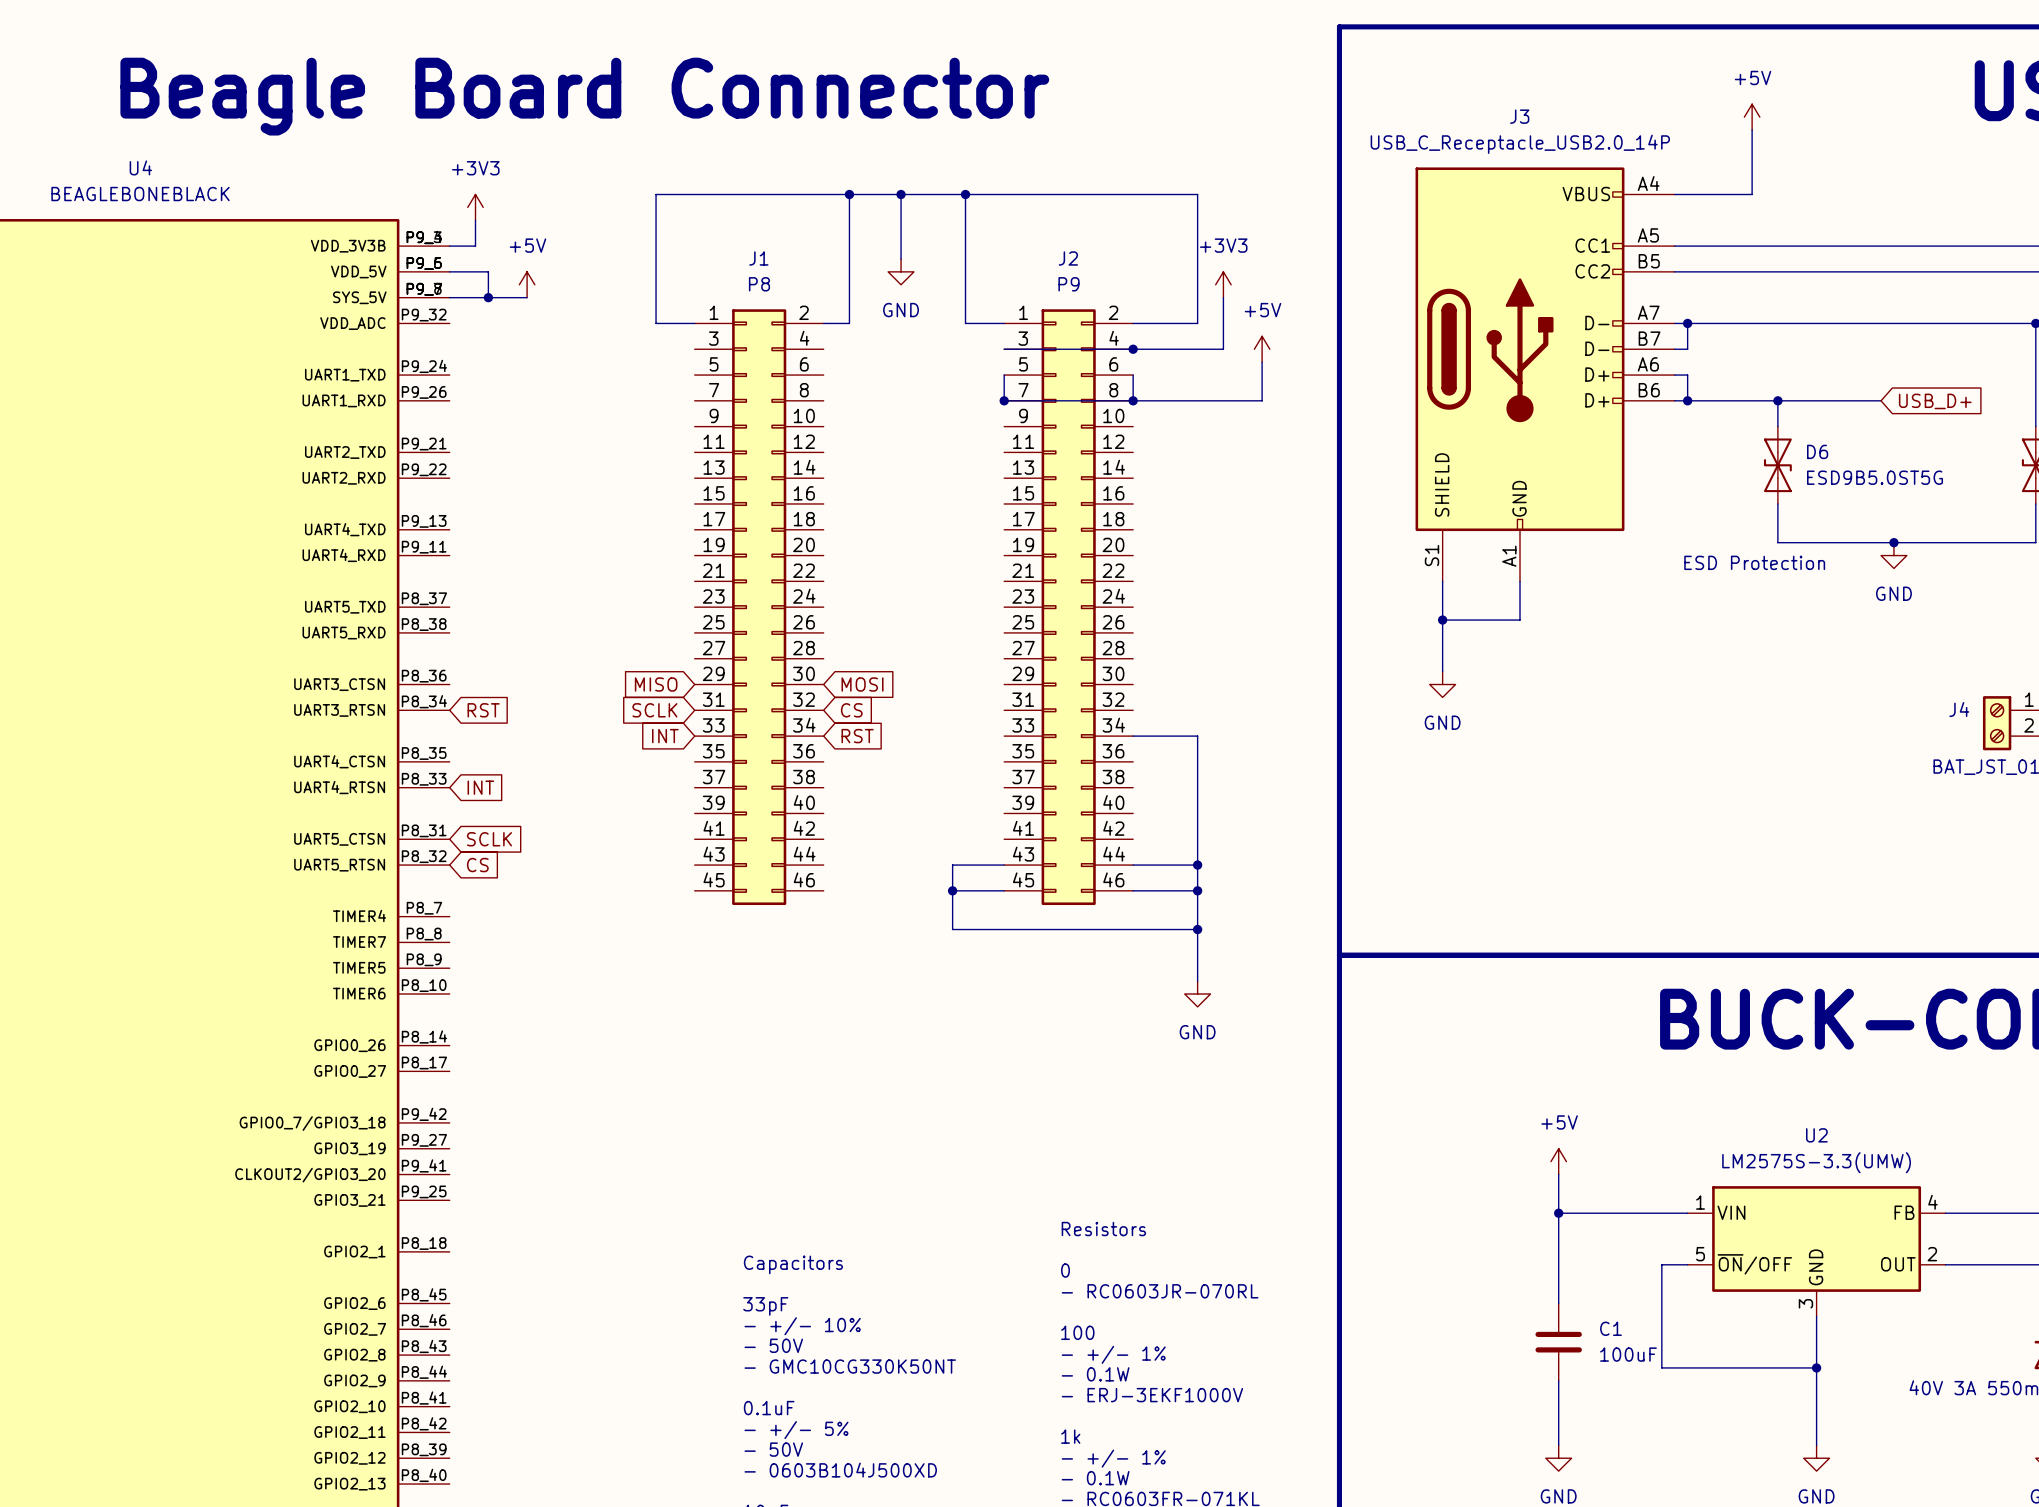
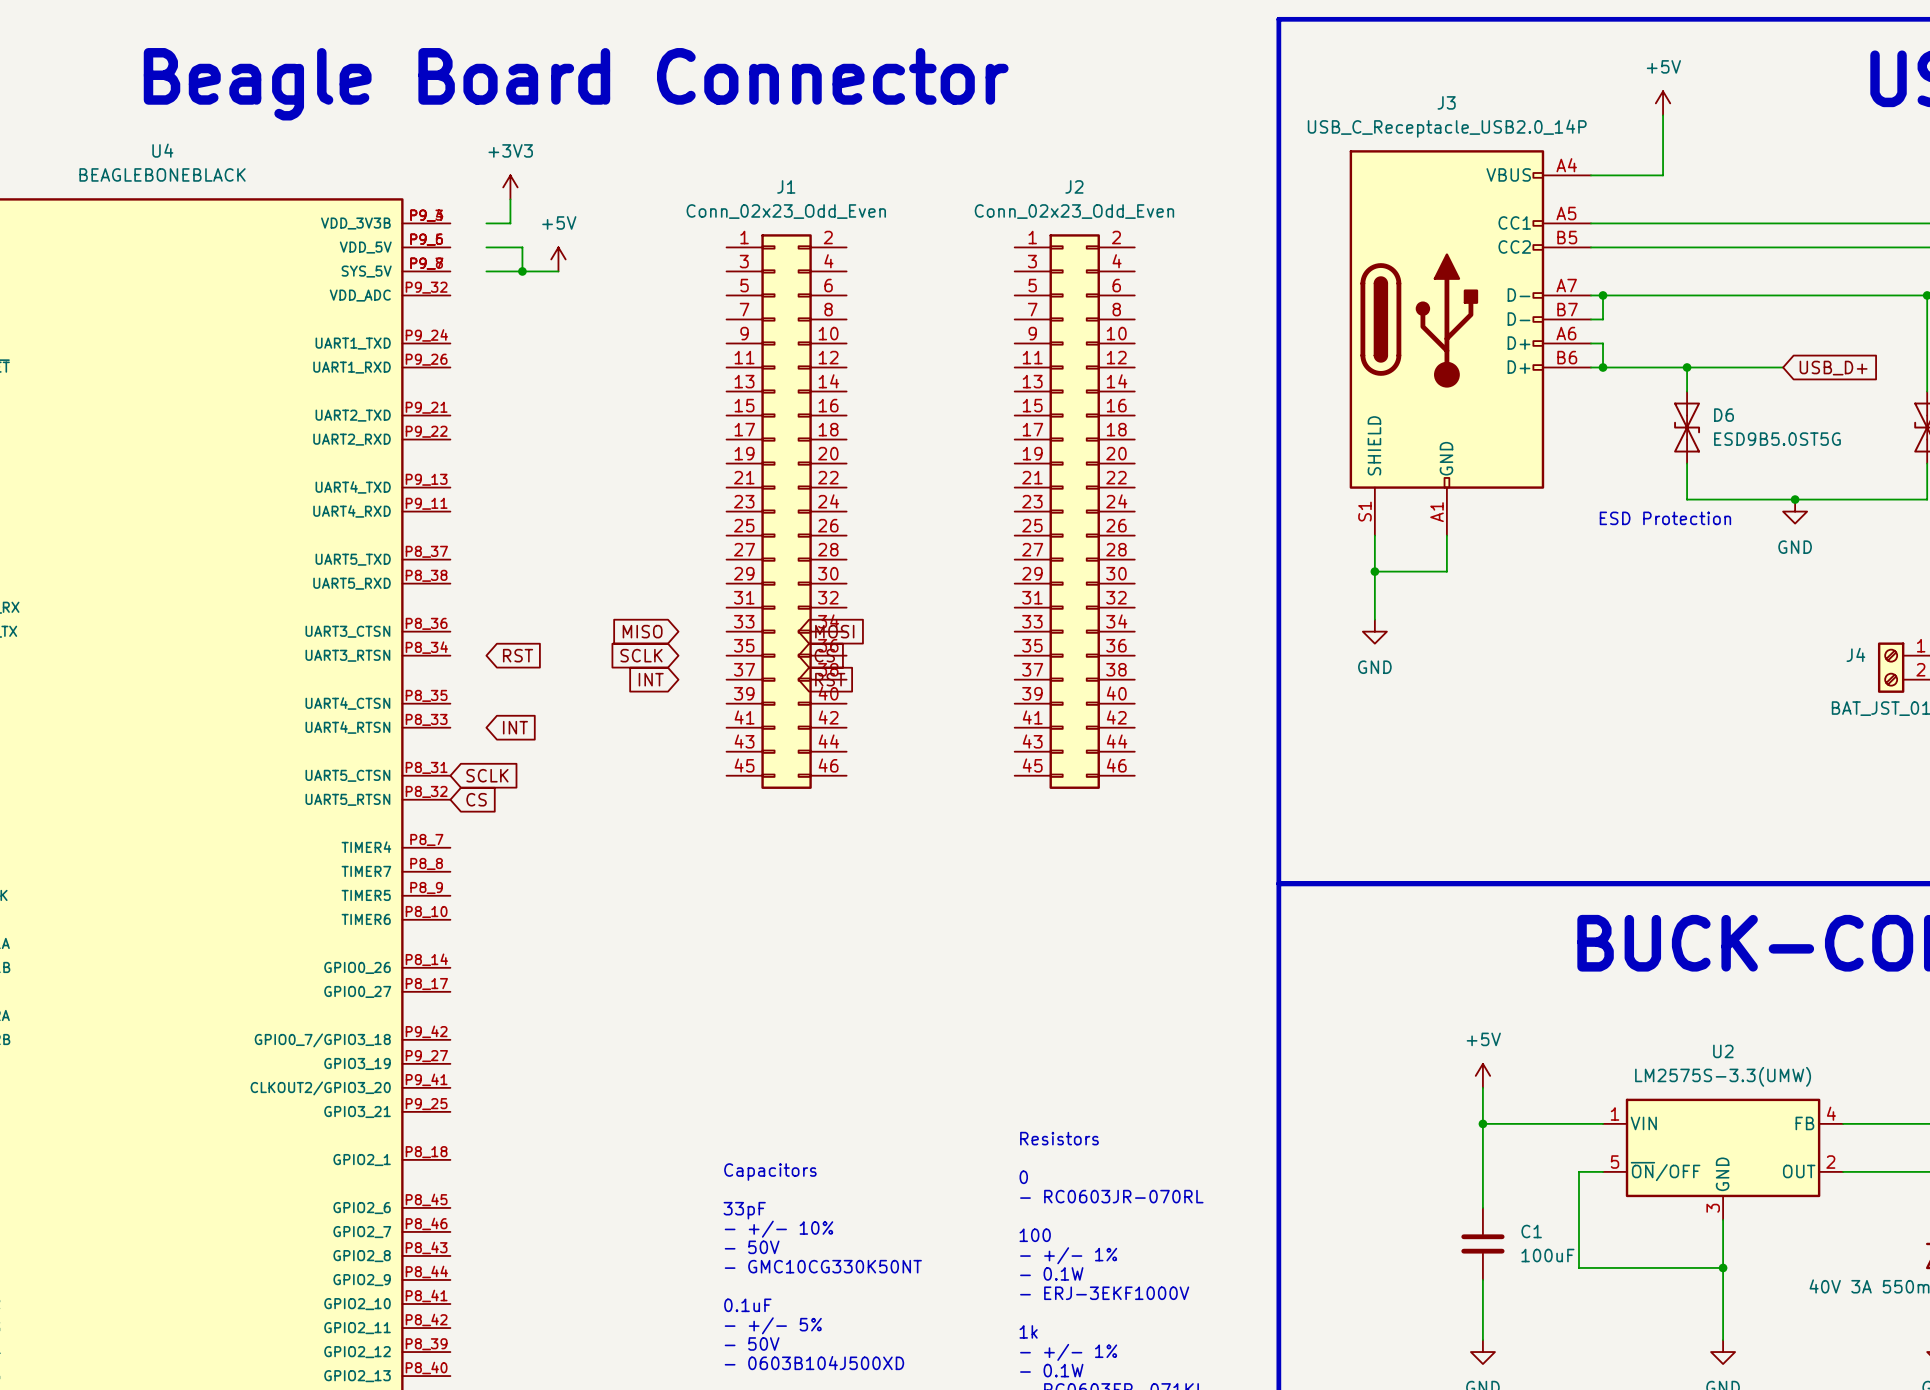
wire: (849, 194) (849, 323) (823, 323) -> none
junction: (849, 194) -> none
wire: (901, 194) (901, 258) -> none
junction: (901, 194) -> none
wire: (965, 194) (965, 323) (1004, 323) -> none
junction: (965, 194) -> none
power symbol position: +3V3 (475, 207) -> +3V3 (510, 187)
wire: (475, 220) (475, 246) (449, 246) -> (510, 199) (510, 223) (486, 223)
wire: (449, 271) (488, 271) (488, 297) (449, 297) -> none
wire: none -> (486, 247) (522, 247) (522, 271) (558, 271)
power symbol: GND (901, 271) -> none
power symbol position: +5V (527, 284) -> +5V (558, 259)
J1 value: P8 (759, 284) -> Conn_02x23_Odd_Even (786, 211)
J2 value: P9 (1068, 284) -> Conn_02x23_Odd_Even (1074, 211)
power symbol: +3V3 (1223, 284) -> none
junction position: (488, 297) -> (522, 271)
wire: (1223, 297) (1223, 349) (1004, 349) -> none
wire: (694, 323) (656, 323) (656, 194) (1197, 194) (1197, 323) (1133, 323) -> none
junction: (1133, 349) -> none
power symbol: +5V (1262, 349) -> none
wire: (1262, 362) (1262, 400) (1004, 400) (1004, 375) -> none
junction: (1004, 400) -> none
junction: (1133, 400) -> none
J1 position: (759, 607) -> (786, 511)
J2 position: (1068, 607) -> (1074, 511)
global label position: RST (483, 710) -> RST (518, 655)
wire: (1133, 736) (1197, 736) (1197, 981) -> none
global label position: INT (480, 787) -> INT (515, 727)
wire: (1004, 865) (952, 865) (952, 929) (1197, 929) -> none
wire: (1133, 865) (1197, 865) -> none
junction: (1197, 865) -> none
wire: (952, 890) (1004, 890) -> none
junction: (952, 890) -> none
wire: (1133, 890) (1197, 890) -> none
junction: (1197, 890) -> none
junction: (1197, 929) -> none
power symbol: GND (1197, 994) -> none

